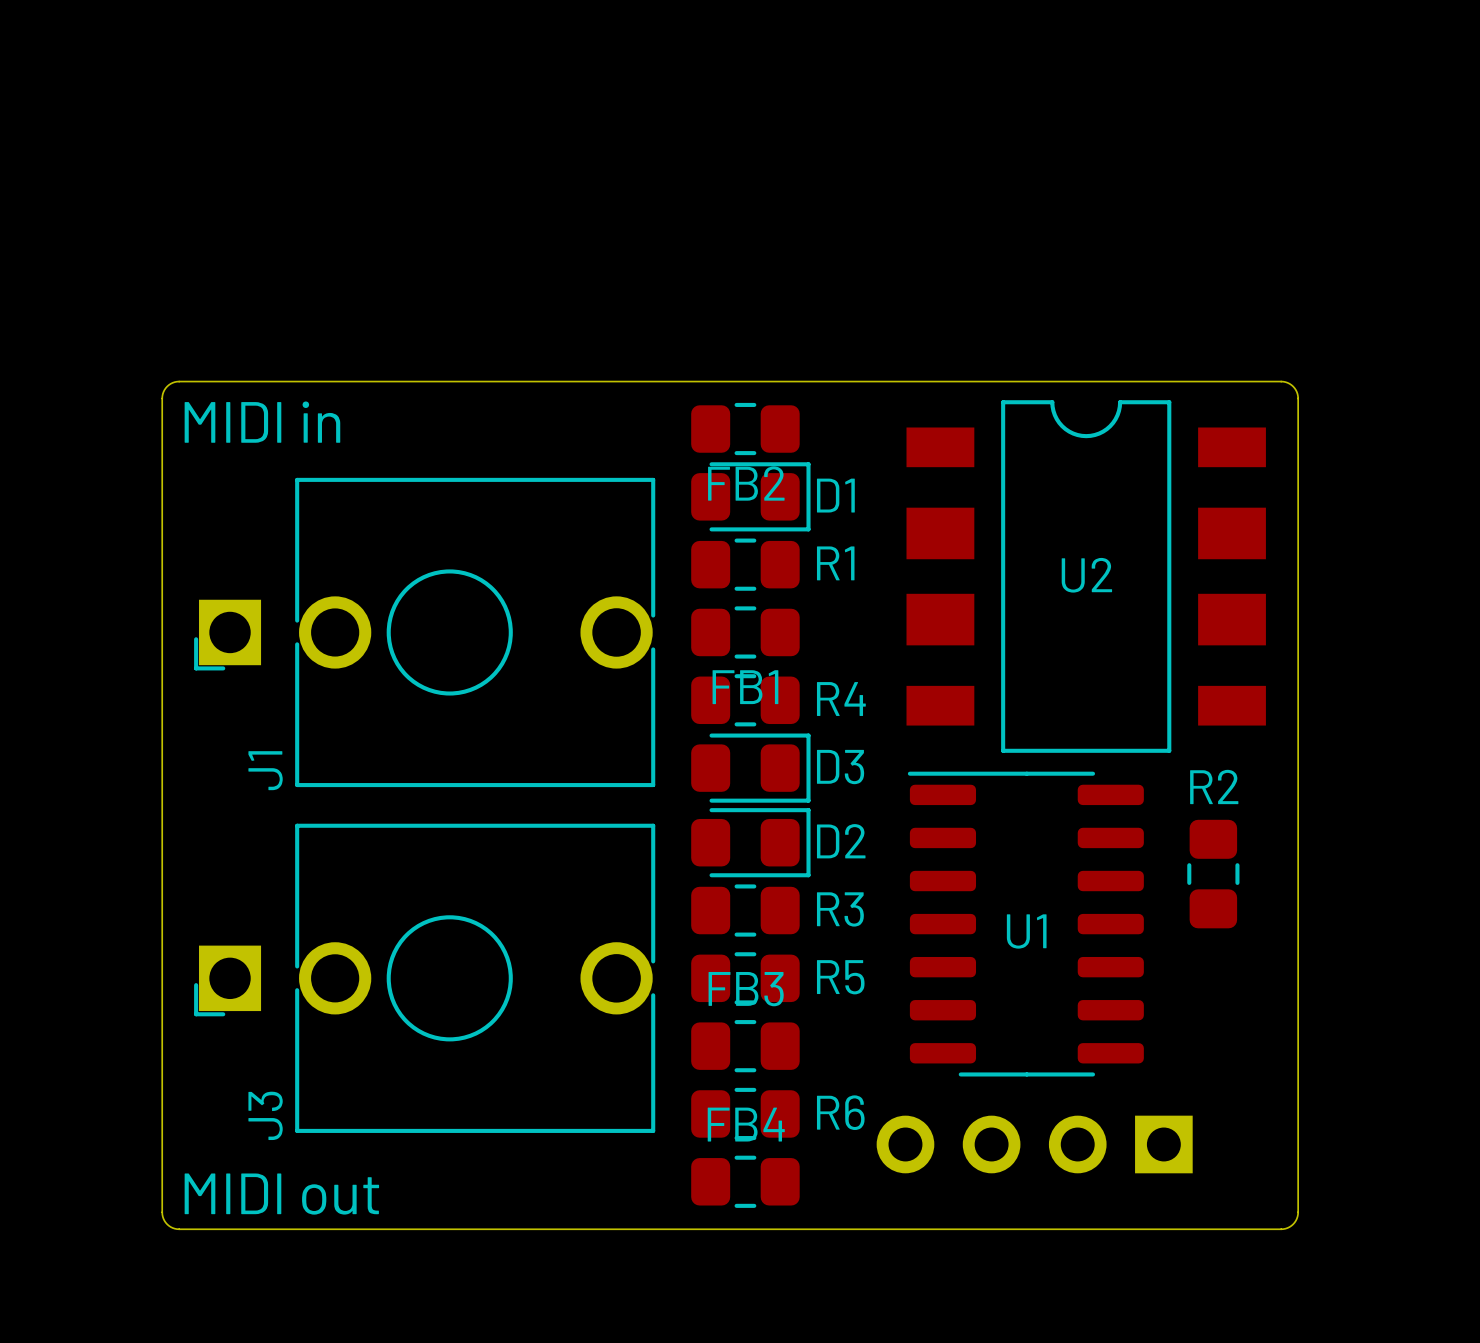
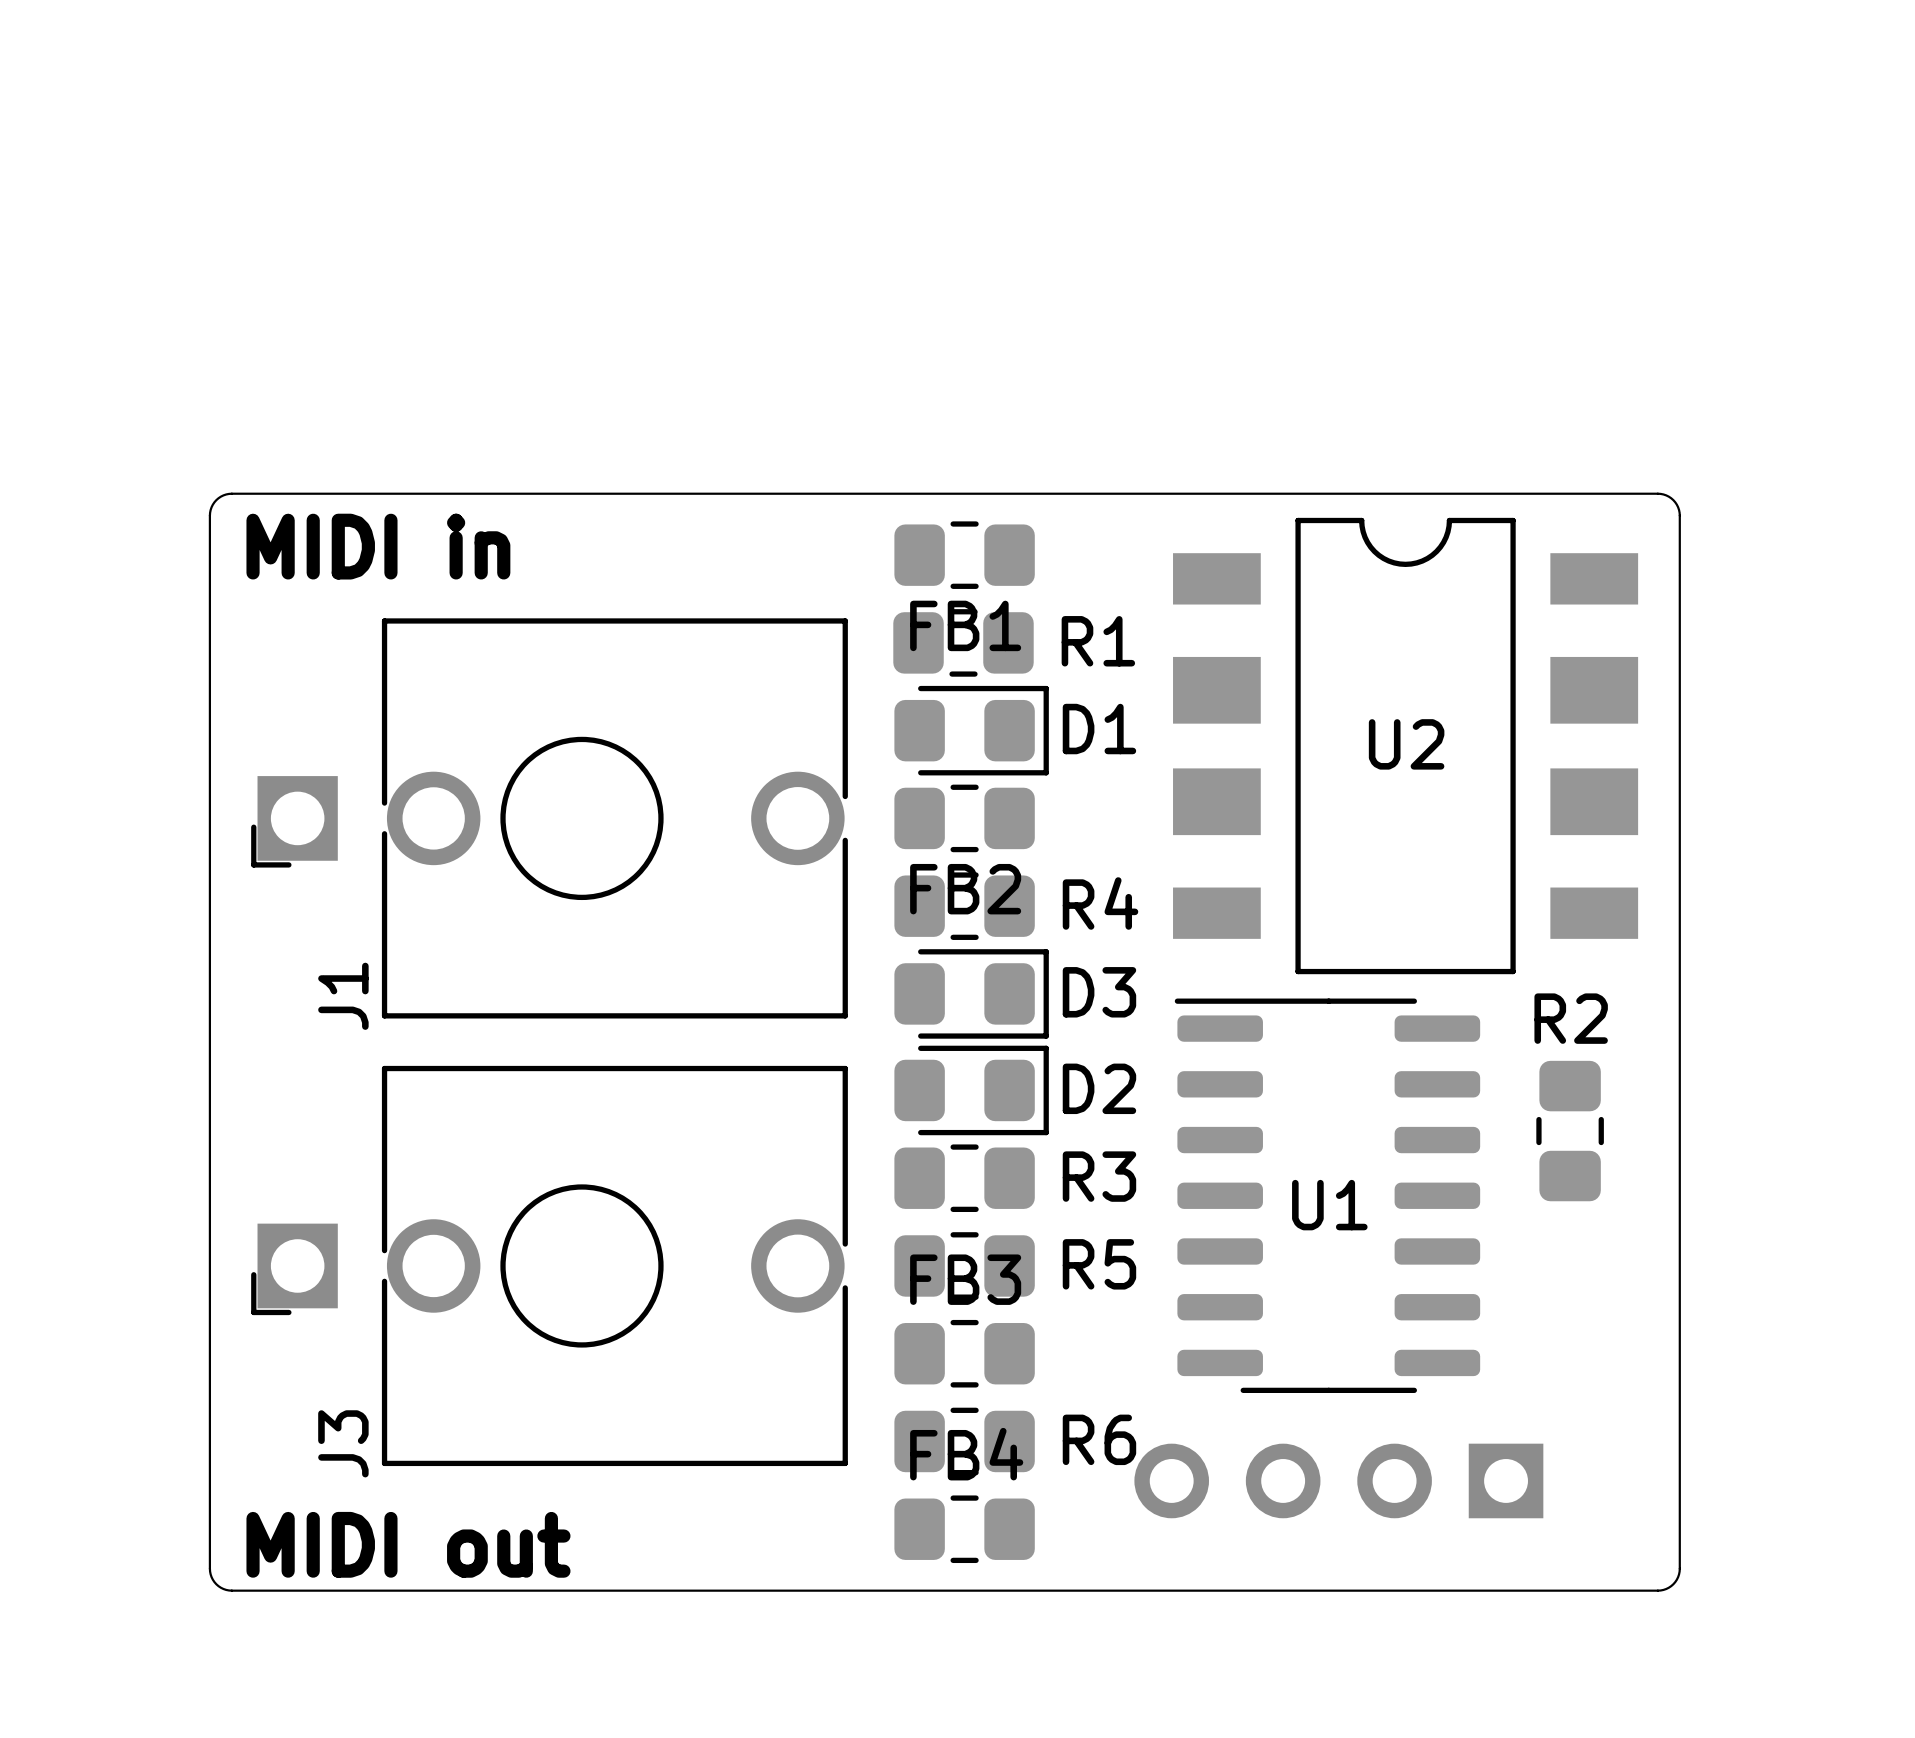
FB2 name: FB2 (746, 483) -> FB1 (965, 625)
D1 position: (750, 496) -> (971, 730)
R1 position: (745, 564) -> (963, 642)
FB1 name: FB1 (745, 687) -> FB2 (965, 889)

